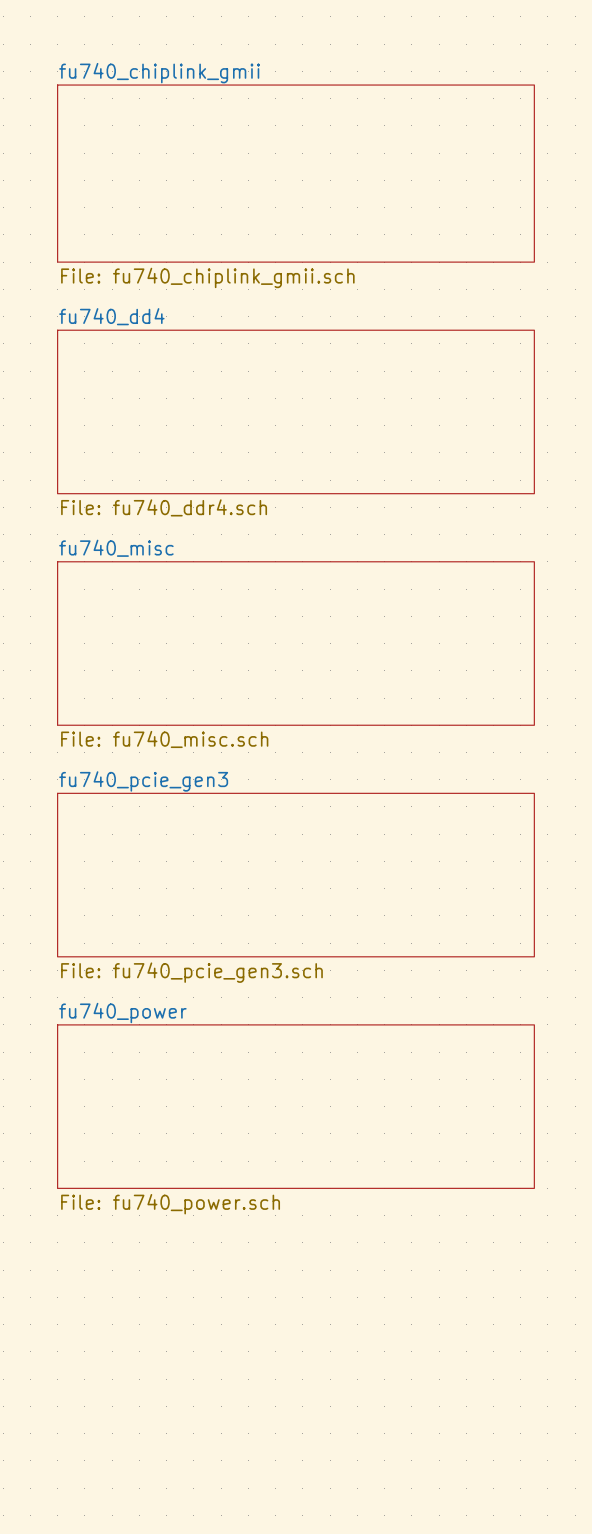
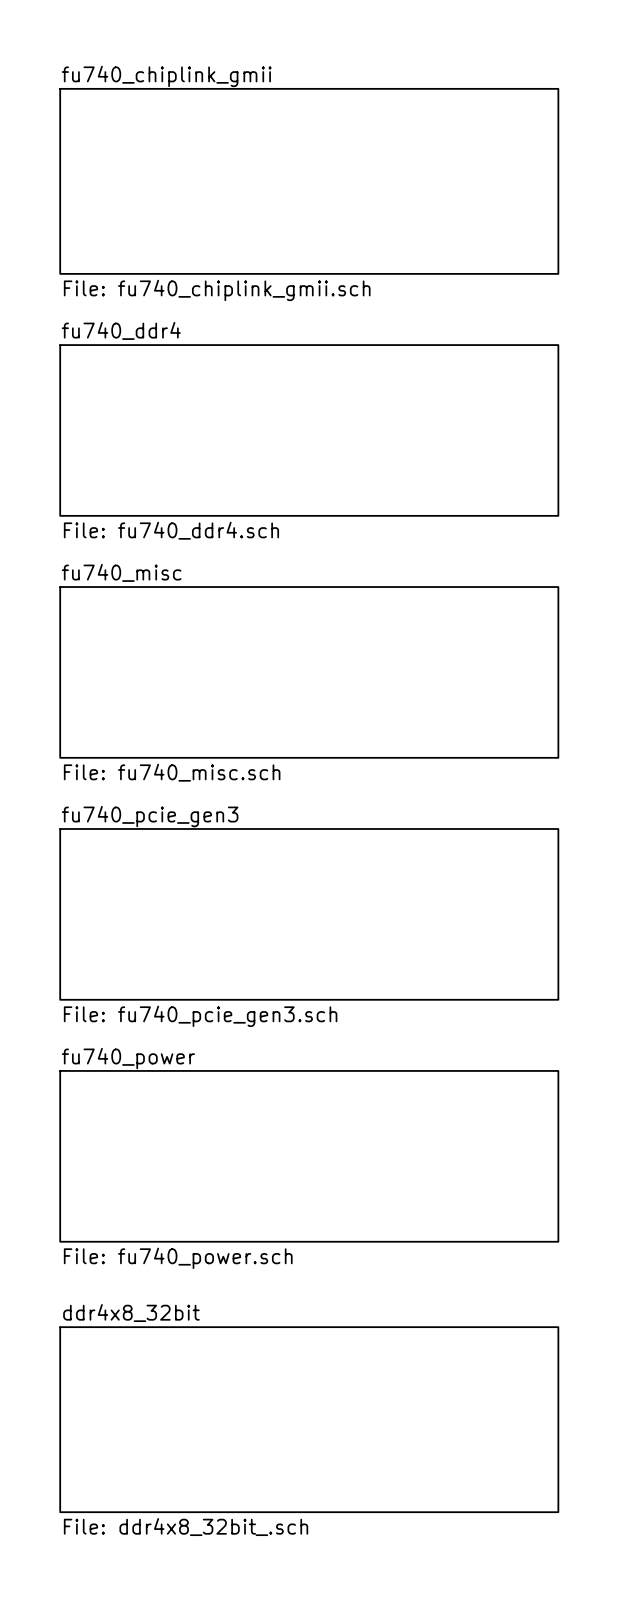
sheet fu740_dd4 name: fu740_dd4 (111, 316) -> fu740_ddr4 (121, 330)
sheet ddr4x8_32bit: none -> File: ddr4x8_32bit_.sch (309, 1419)

